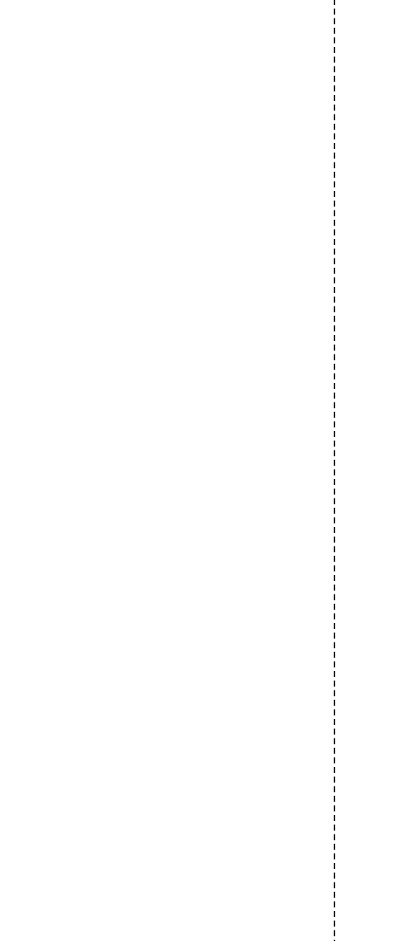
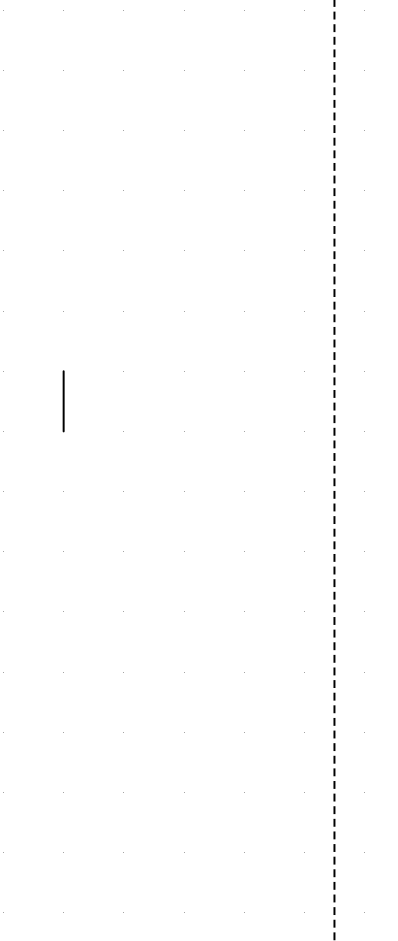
wire: none -> (63, 371) (63, 431)

